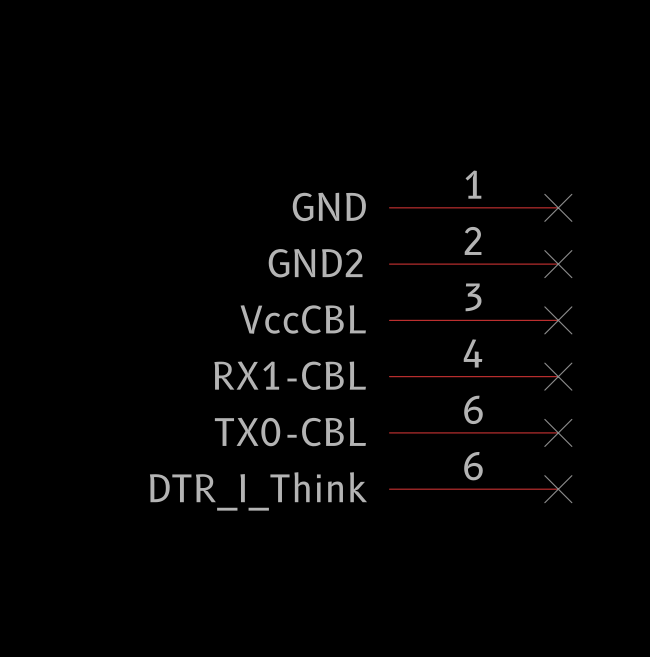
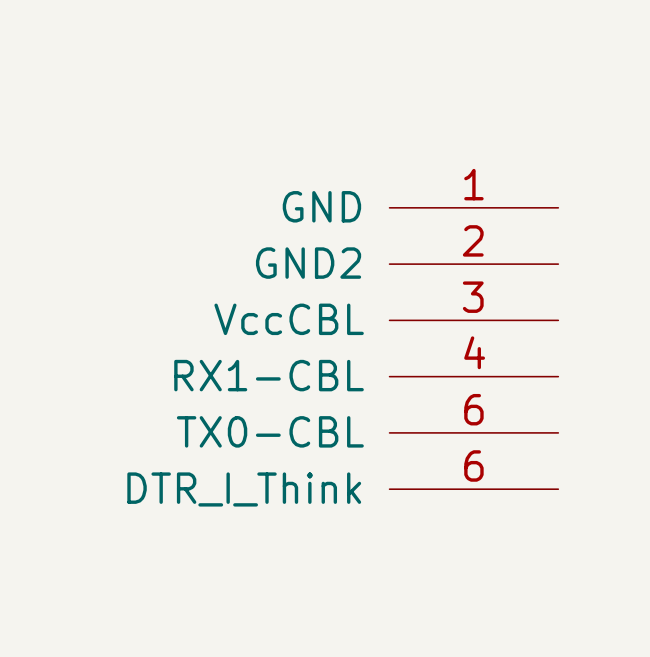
no-connect mark: (558, 207) -> none
no-connect mark: (558, 264) -> none
no-connect mark: (558, 320) -> none
no-connect mark: (558, 376) -> none
no-connect mark: (558, 432) -> none
no-connect mark: (558, 489) -> none

